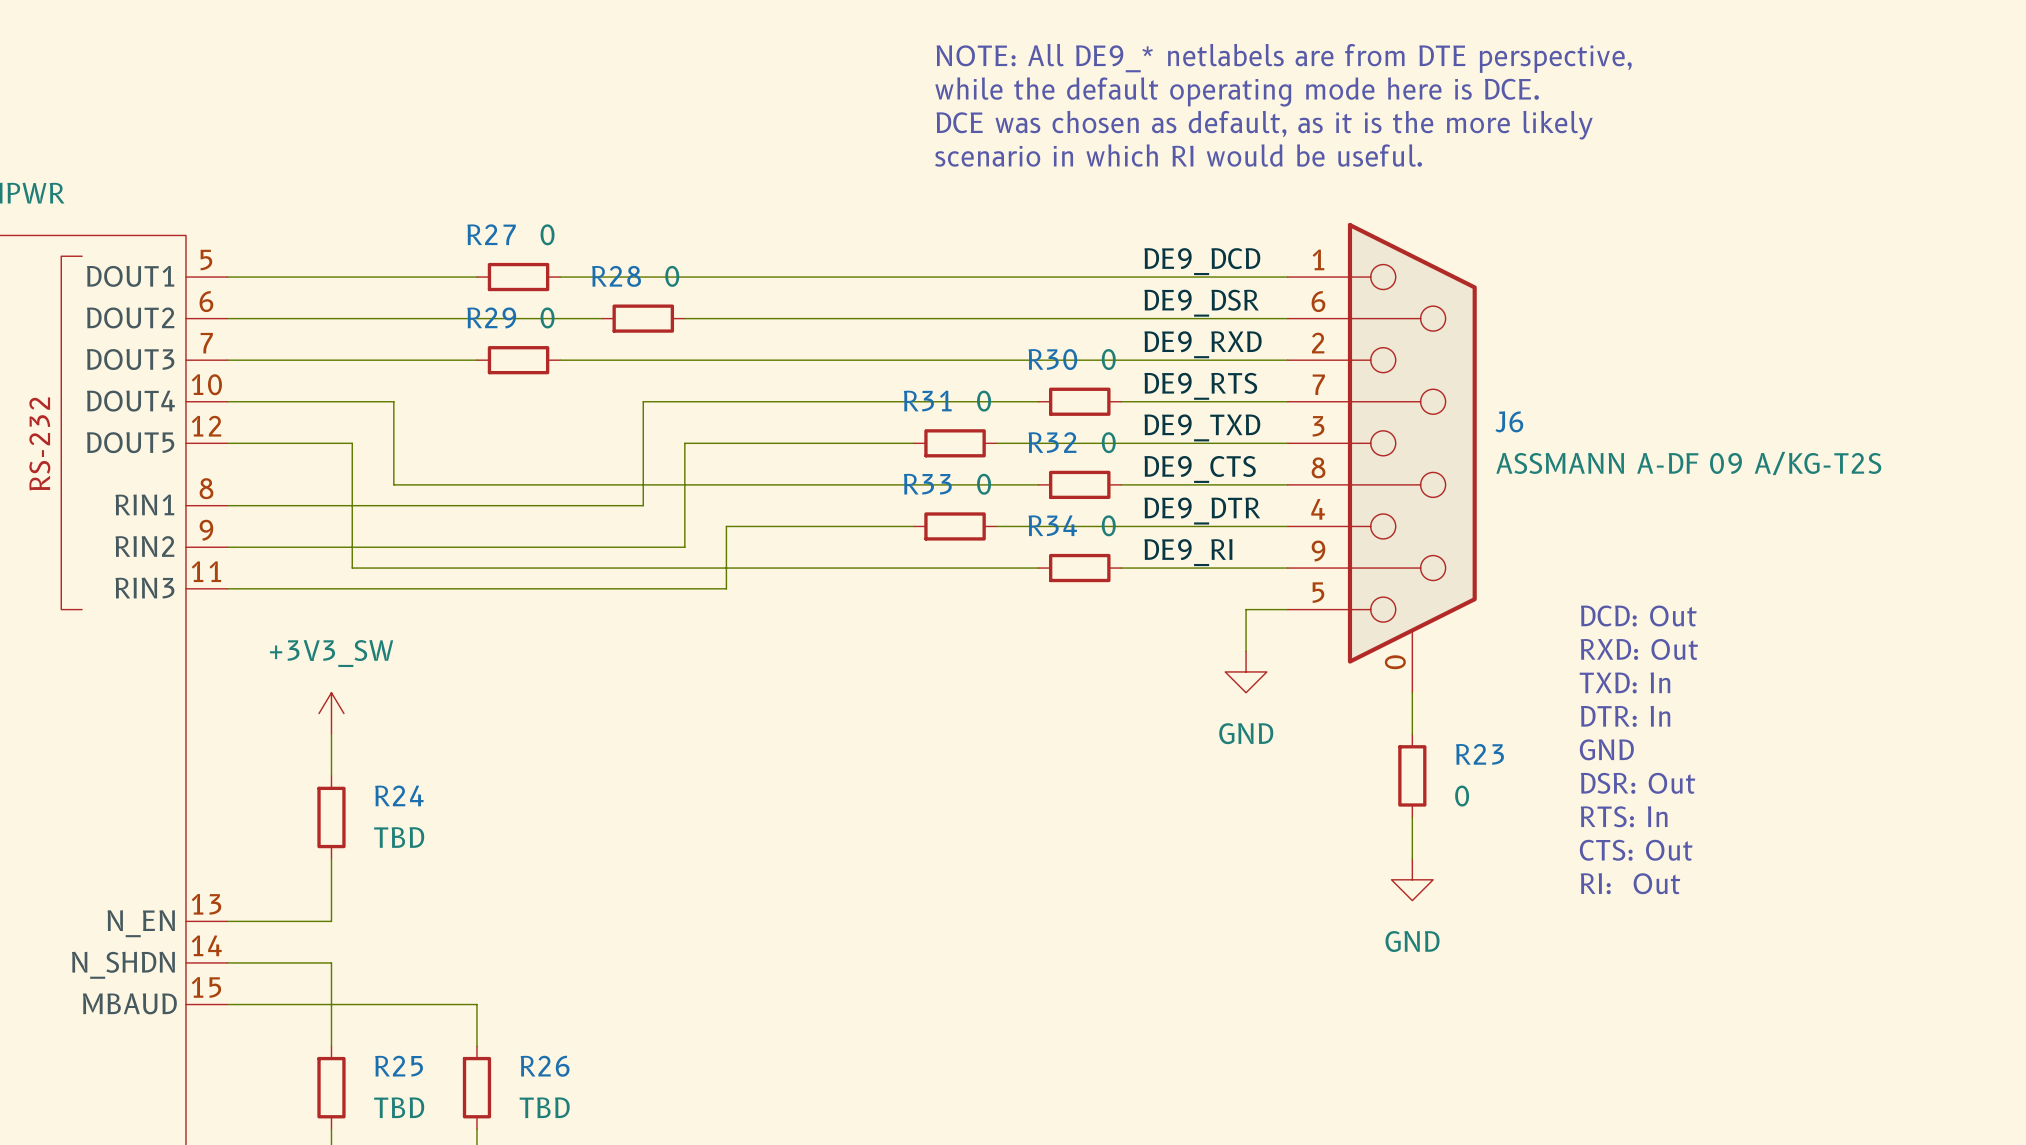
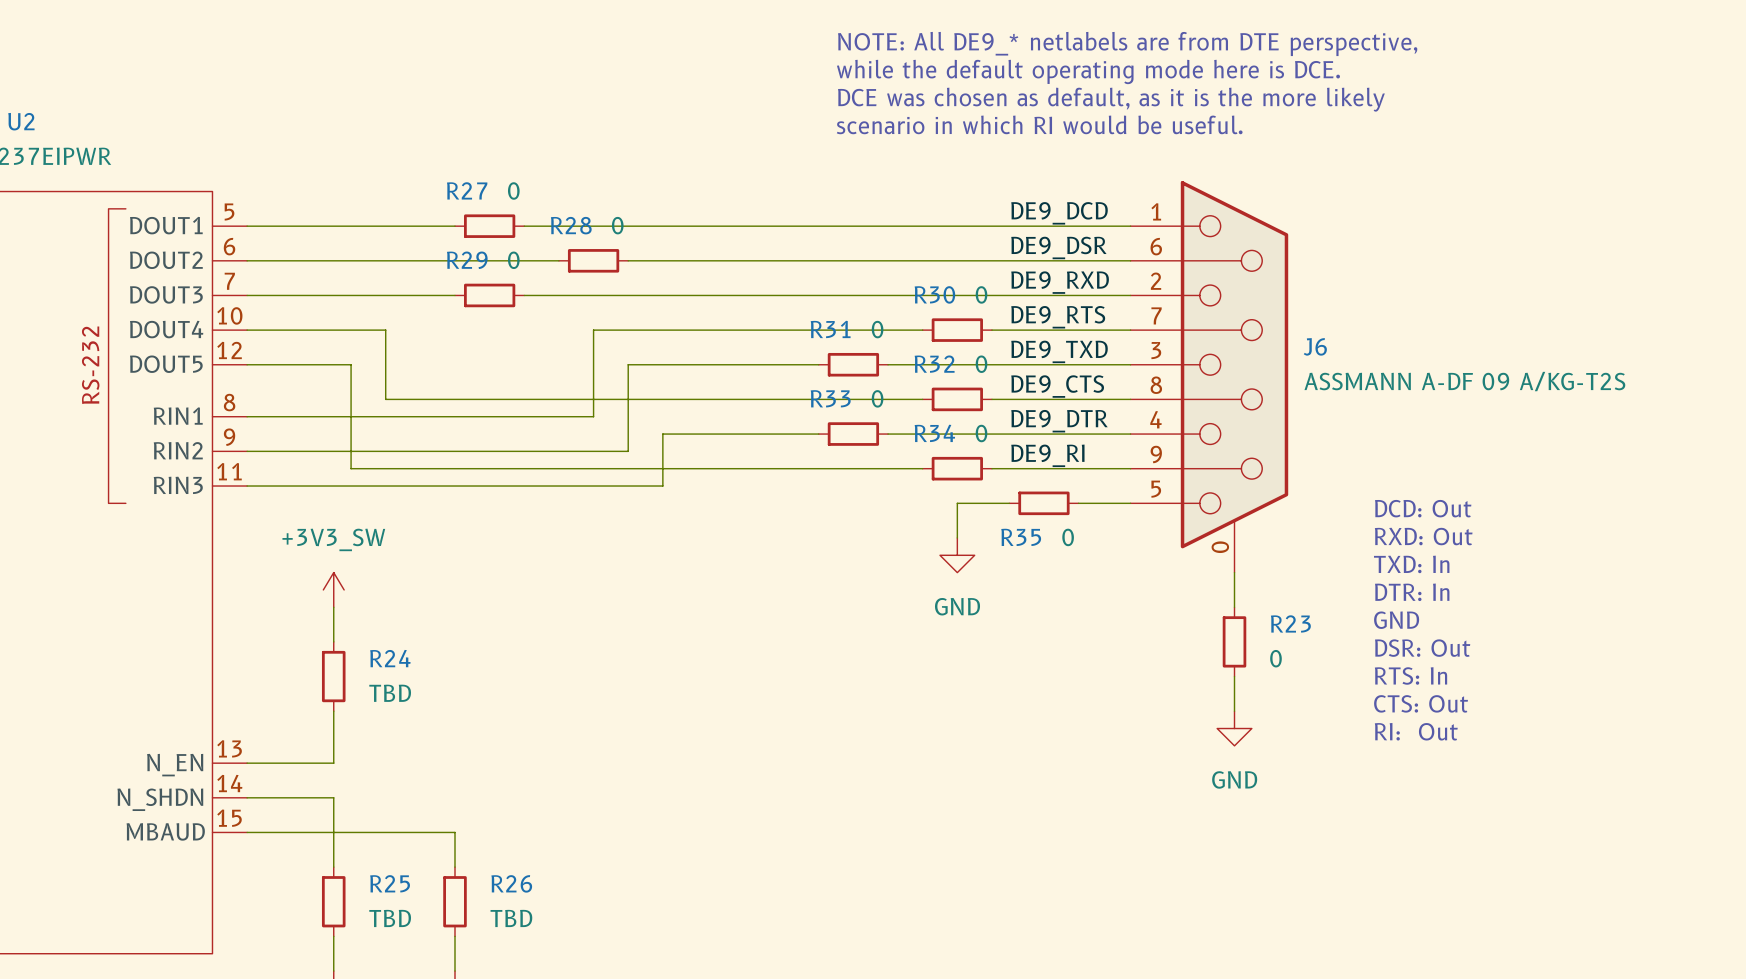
wire: none -> (1009, 503) (957, 503) (957, 537)
R35: none -> 0 (1043, 503)
wire: (1246, 609) (1246, 651) -> (1095, 503) (1078, 503)
power symbol position: GND (1246, 671) -> GND (957, 555)

